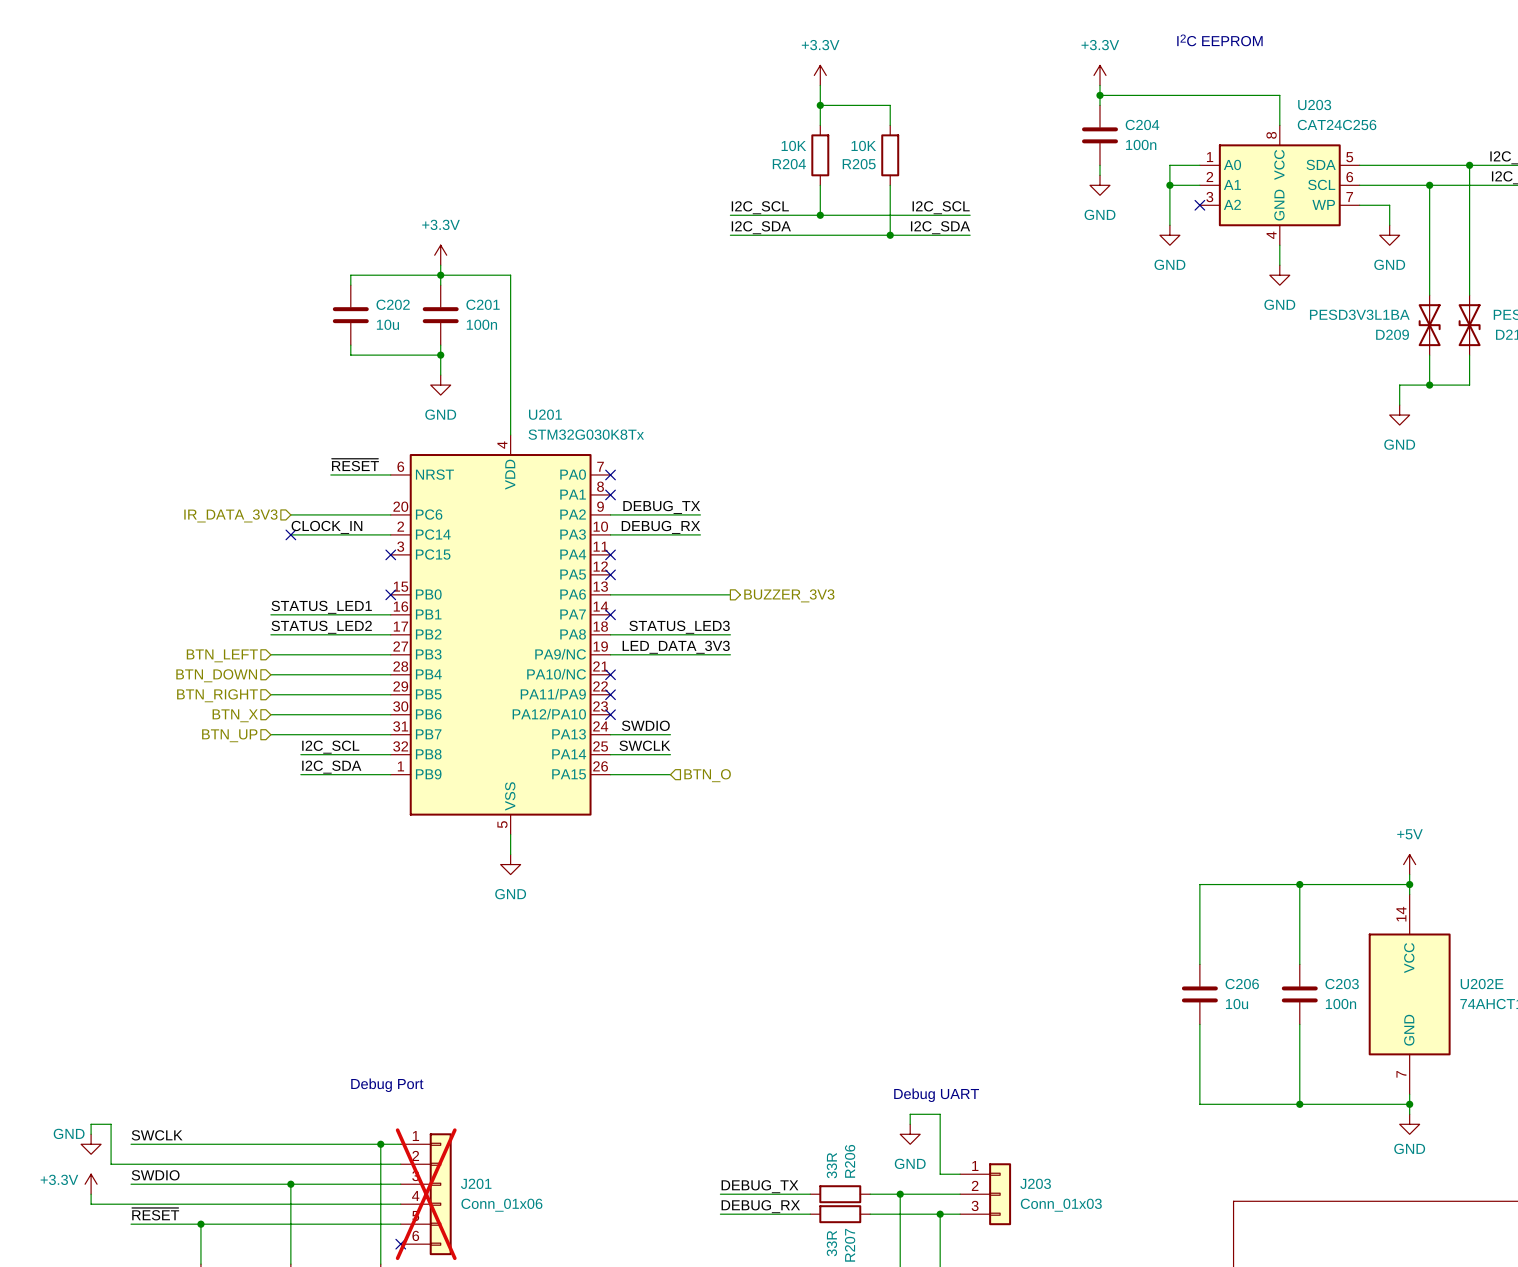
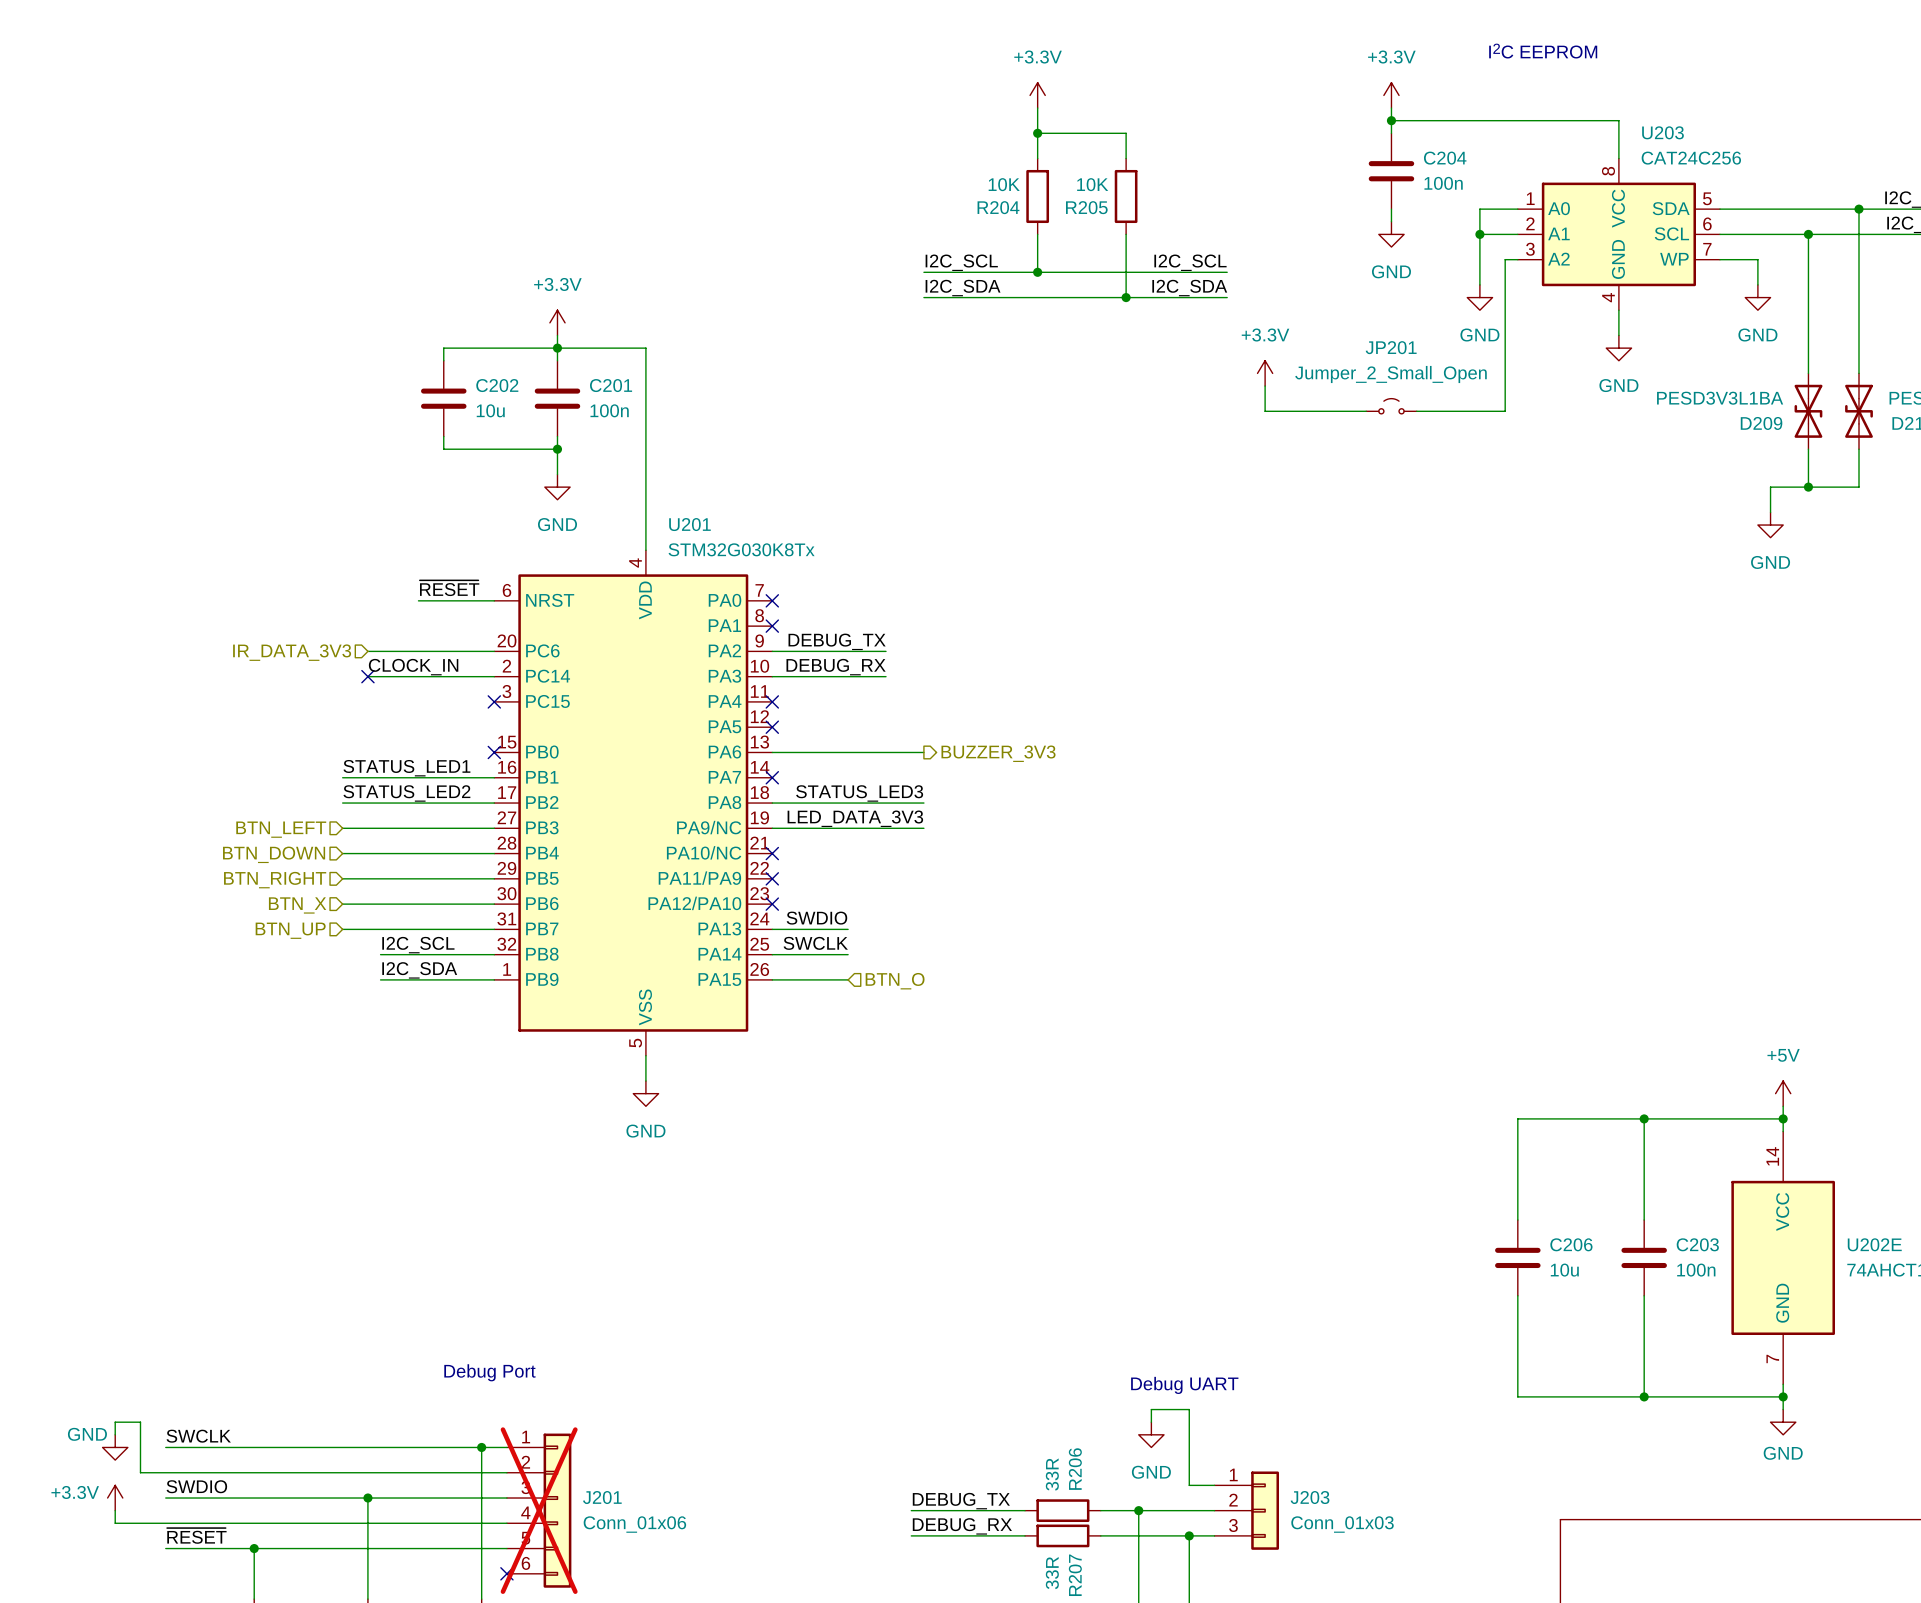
wire: none -> (1517, 259) (1505, 259) (1505, 411) (1416, 411)
no-connect mark: (1199, 205) -> none
power symbol: none -> +3.3V (1265, 373)
wire: none -> (1265, 386) (1265, 411) (1366, 411)
JP201: none -> Jumper_2_Small_Open (1391, 406)

